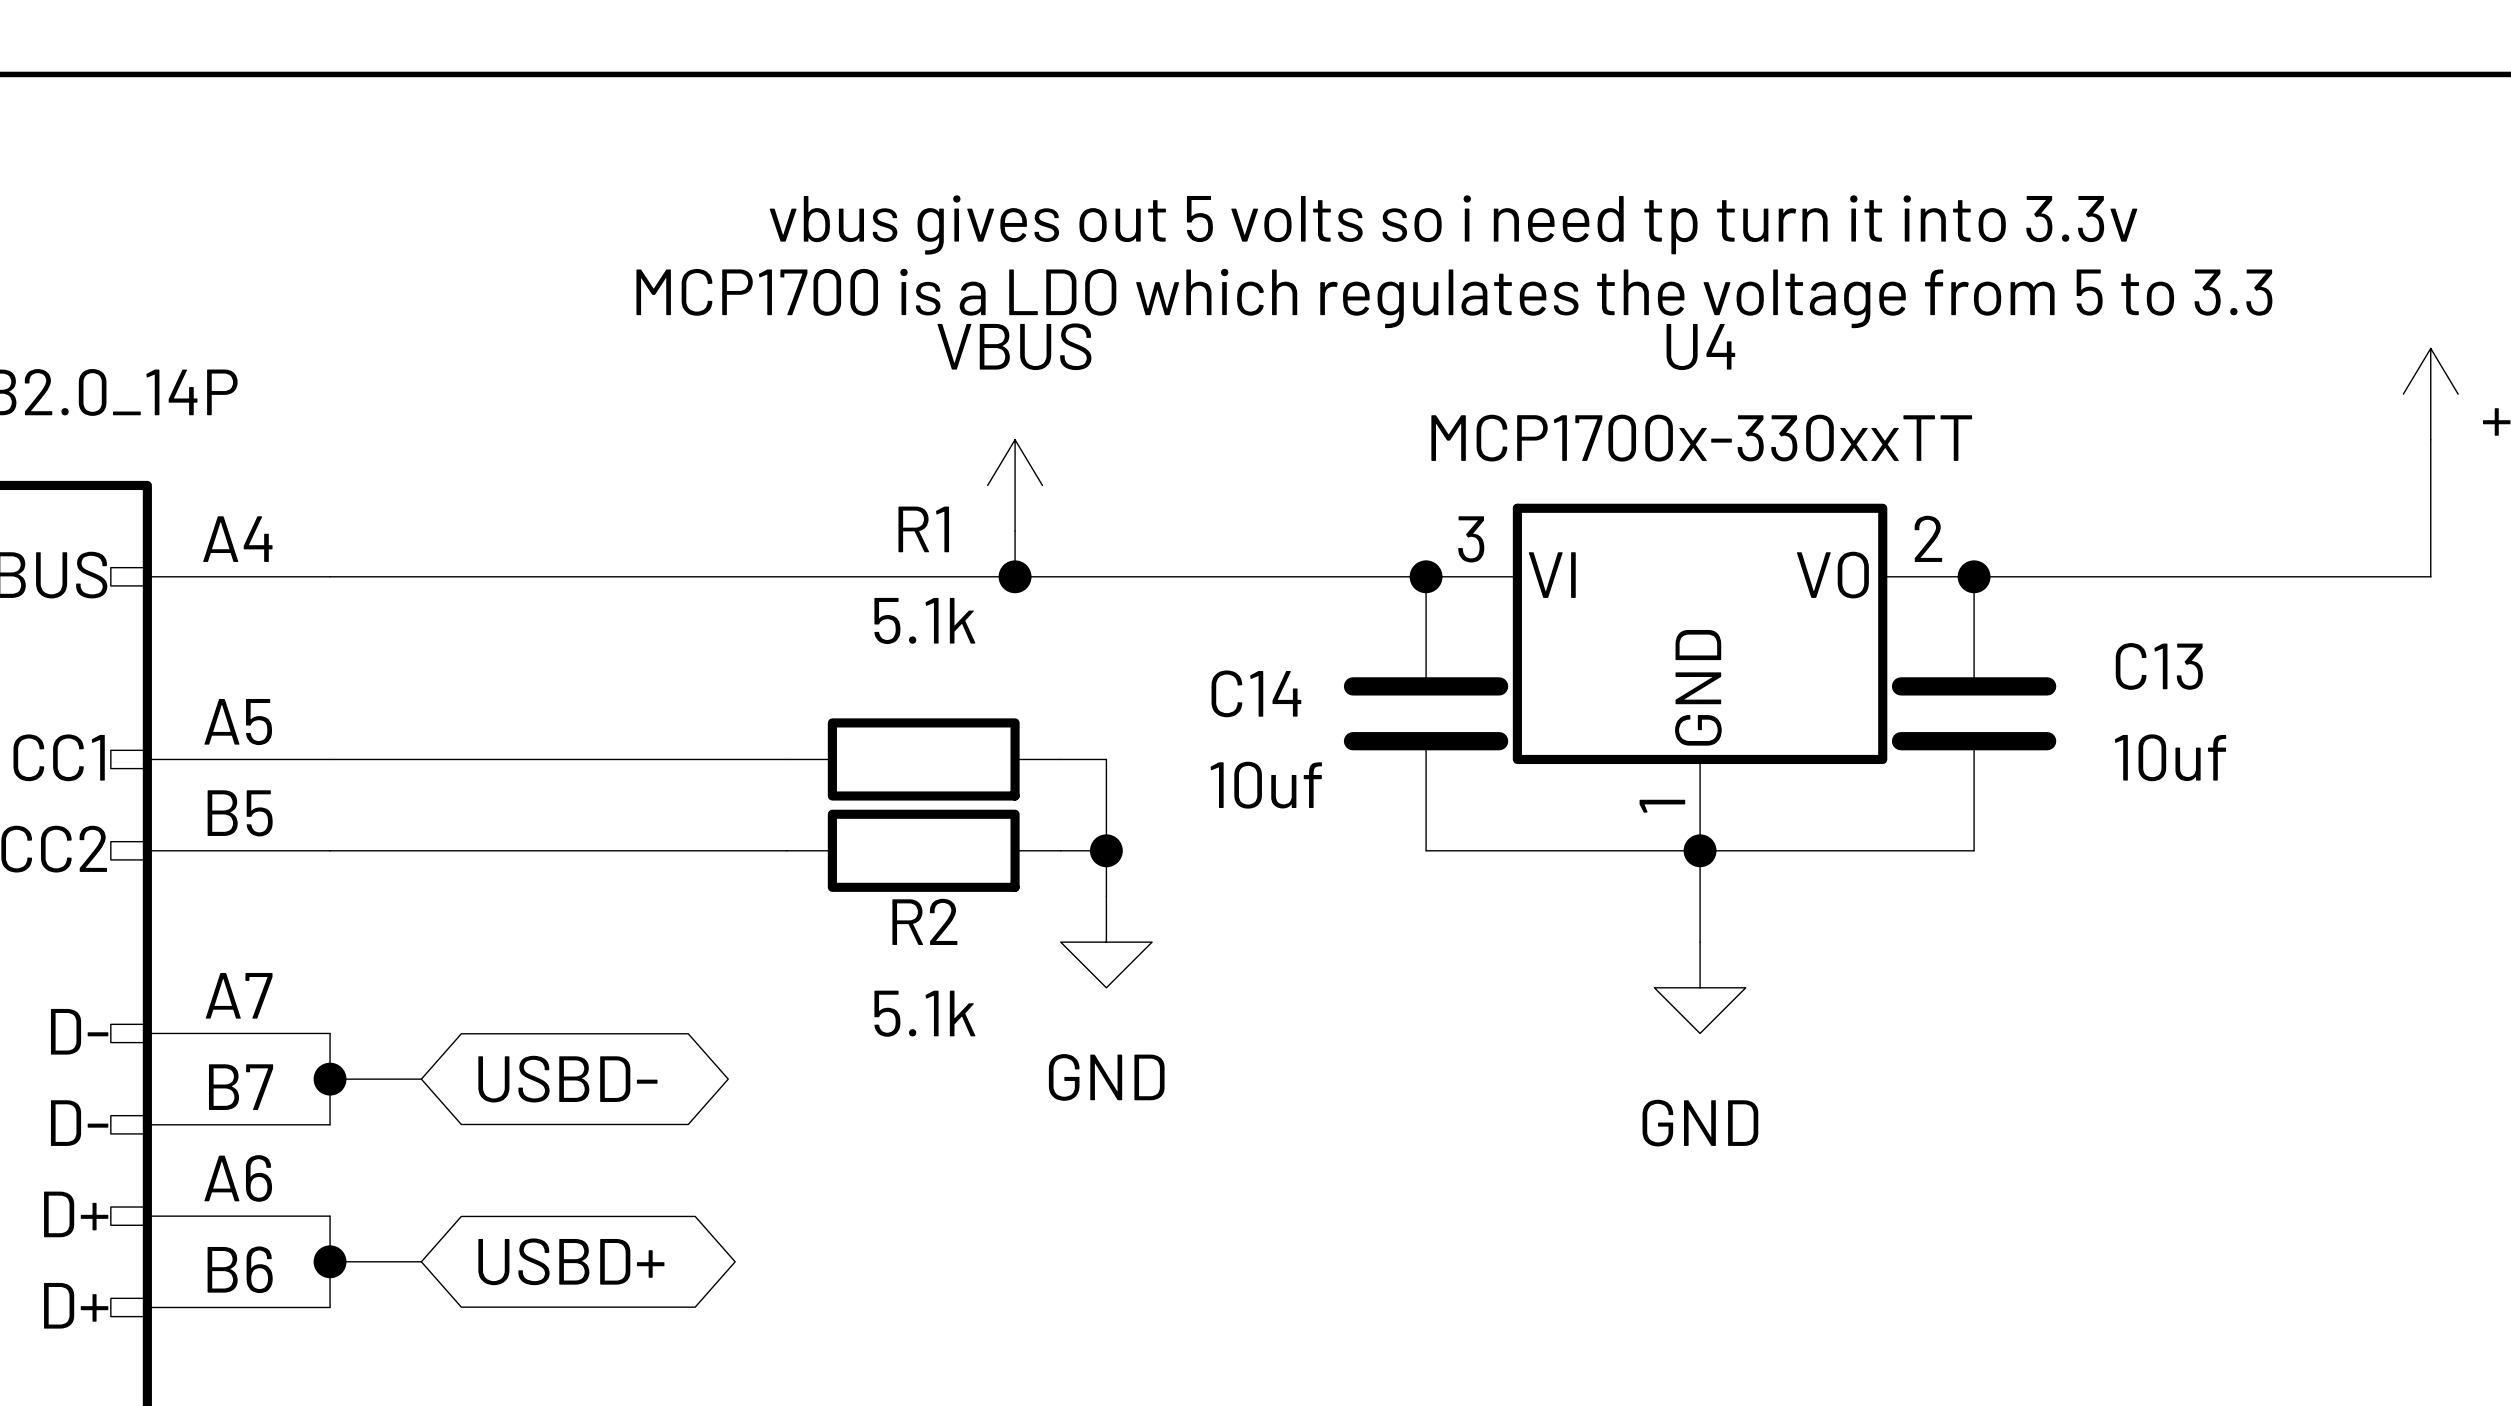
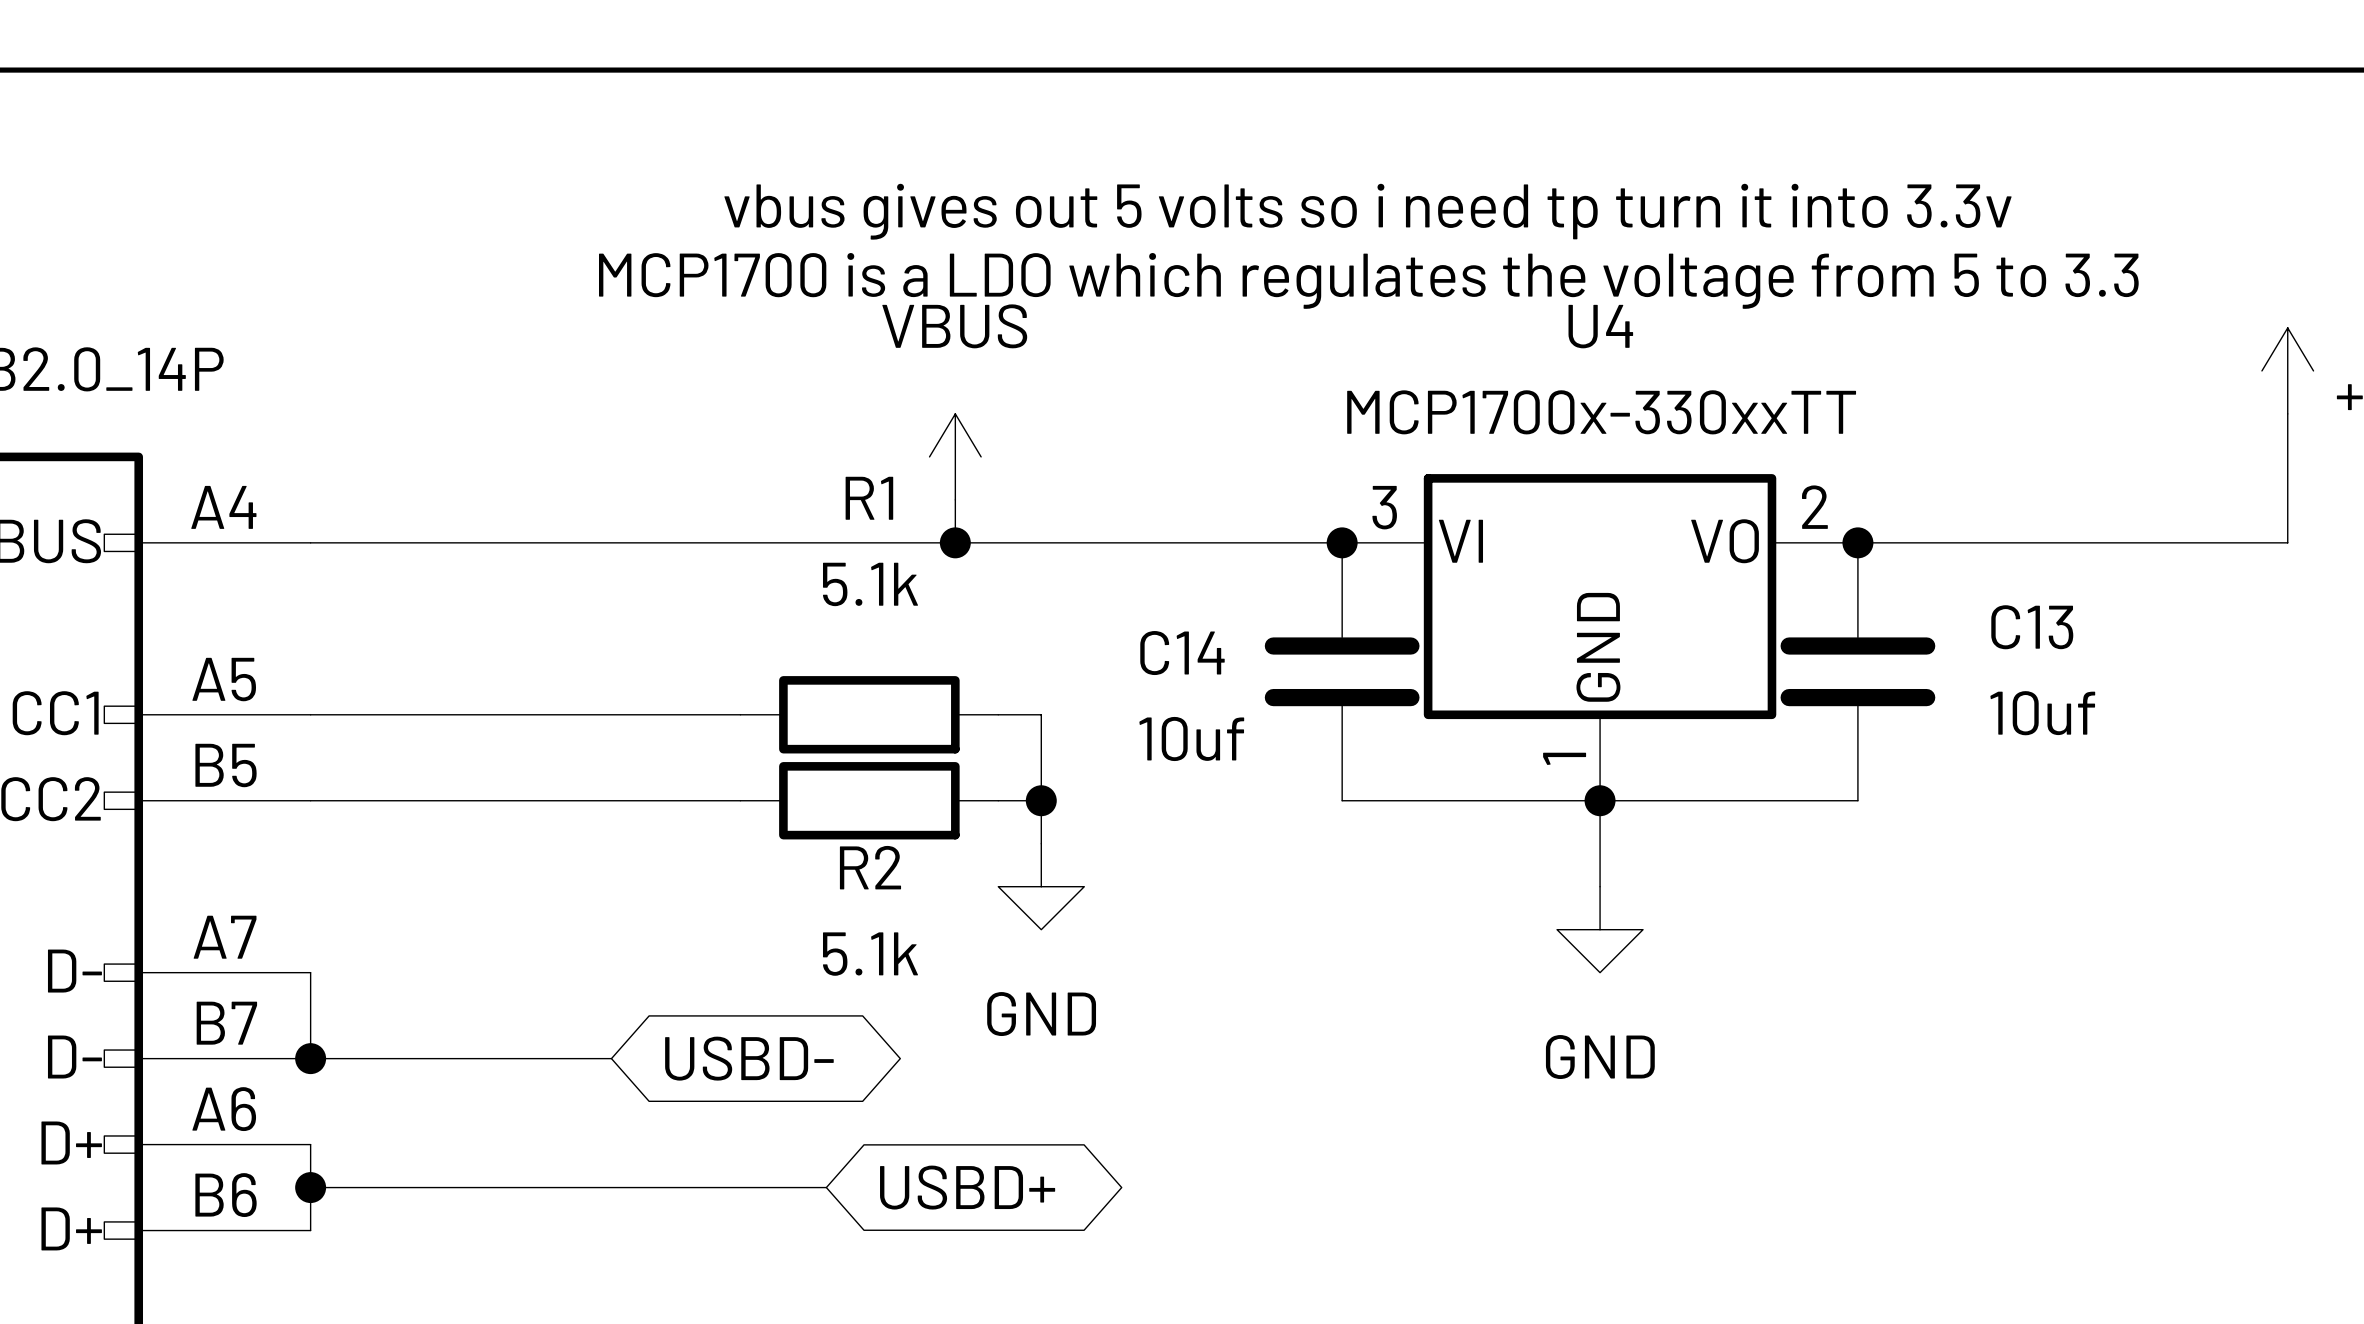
wire: (330, 1079) (421, 1079) -> none
junction position: (330, 1079) -> (310, 1058)
global label position: USBD- (567, 1079) -> USBD- (749, 1058)
wire: none -> (310, 1058) (611, 1058)
wire: none -> (396, 1187) (826, 1187)
global label position: USBD+ (571, 1261) -> USBD+ (967, 1187)

